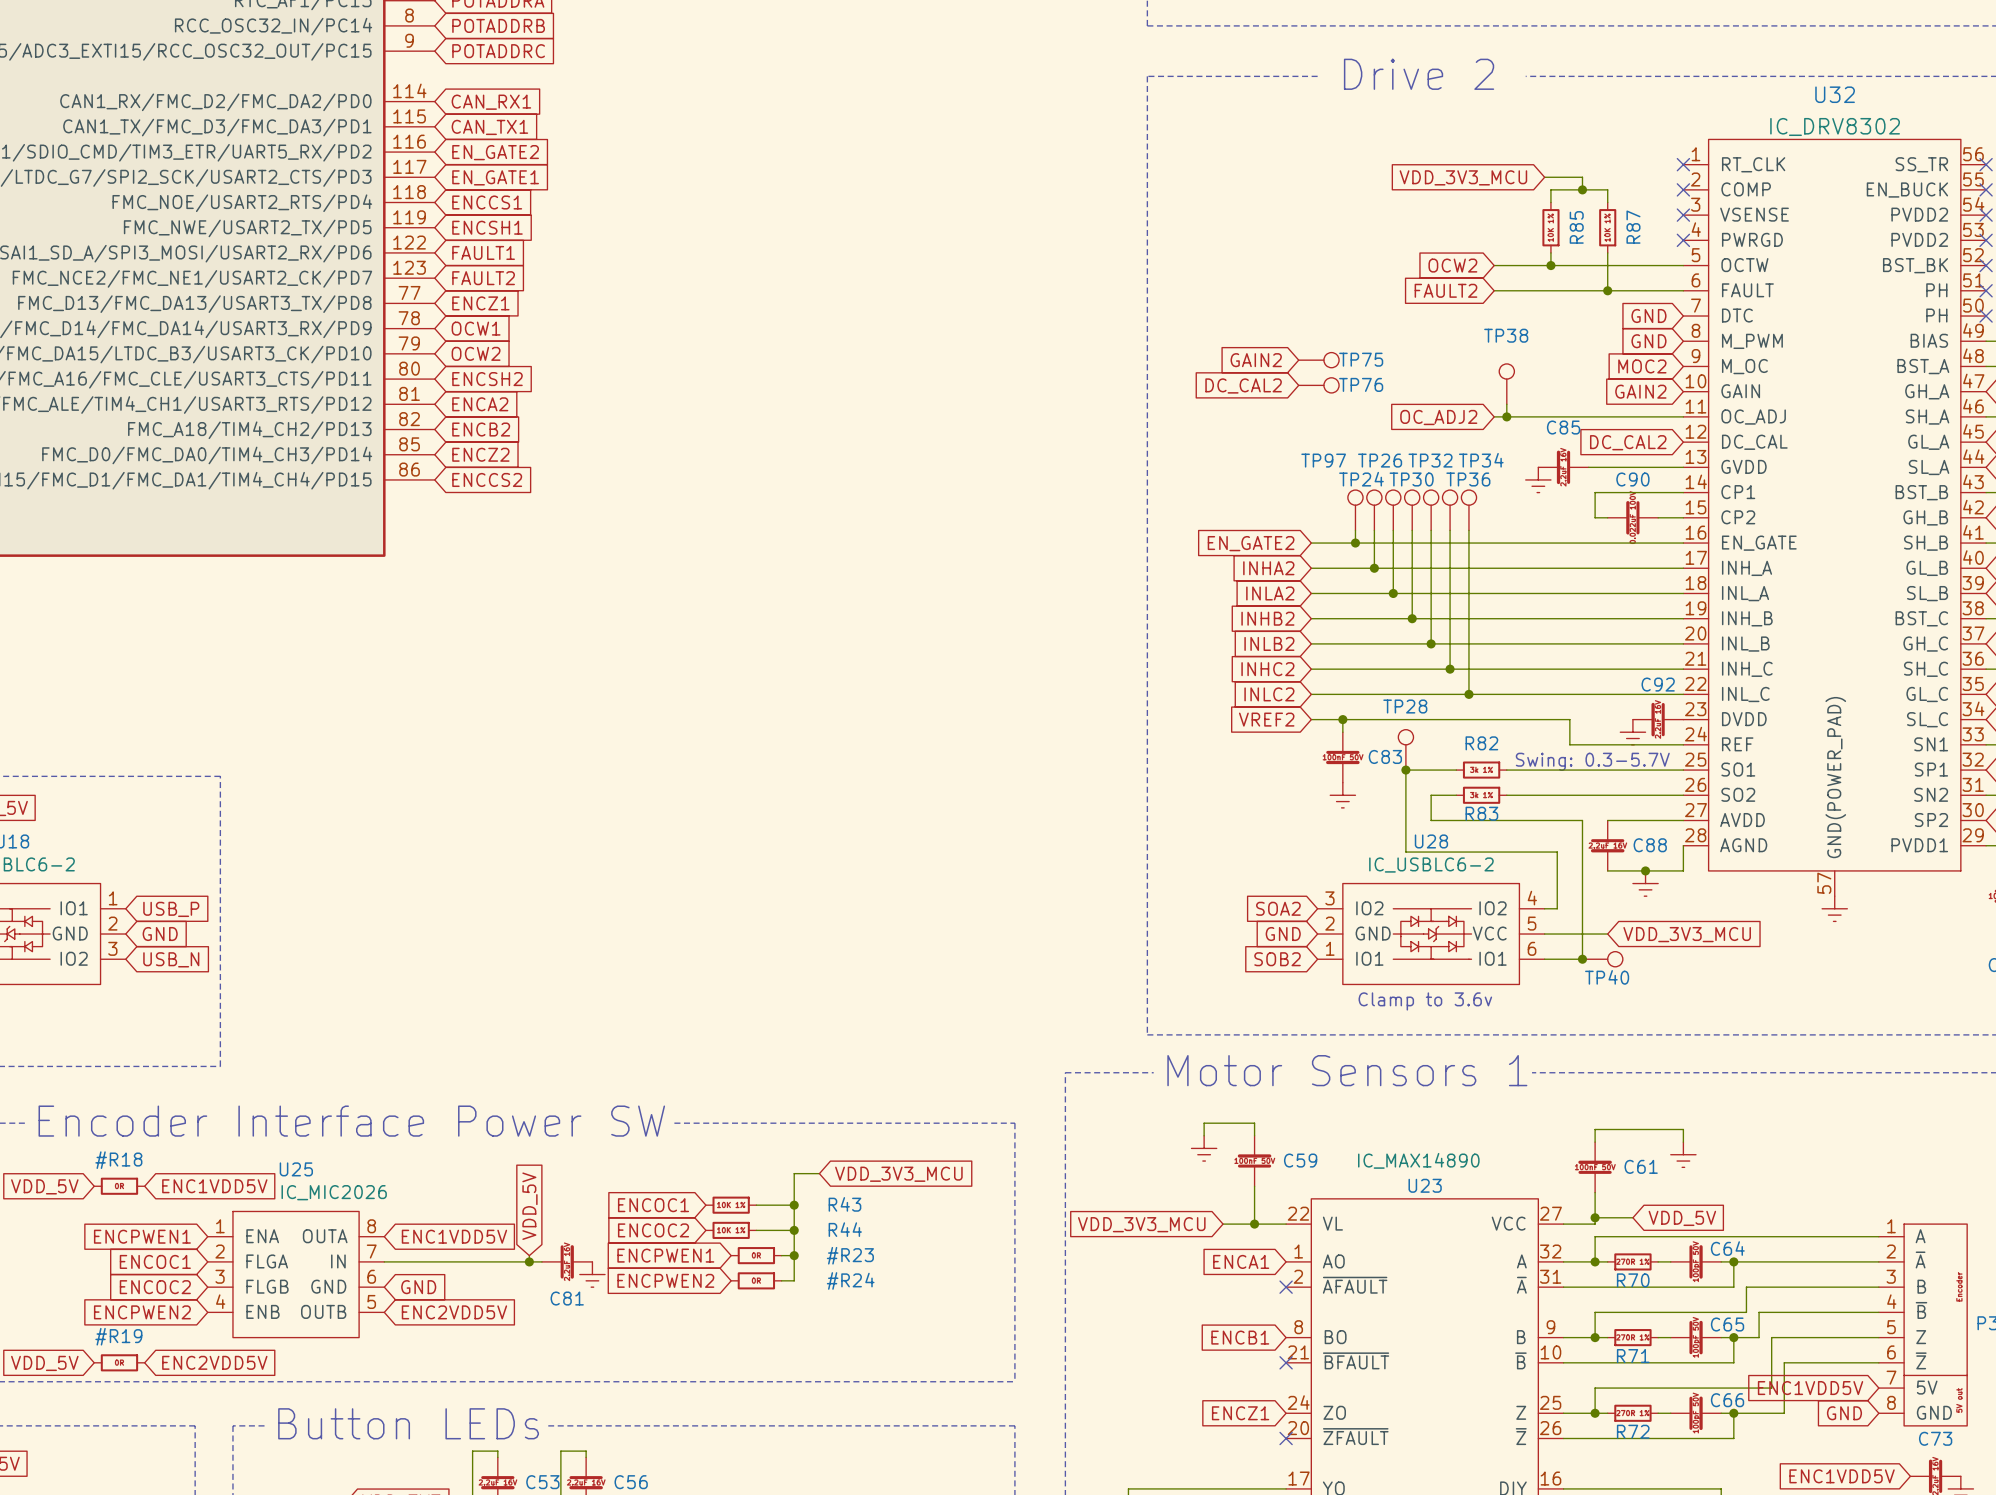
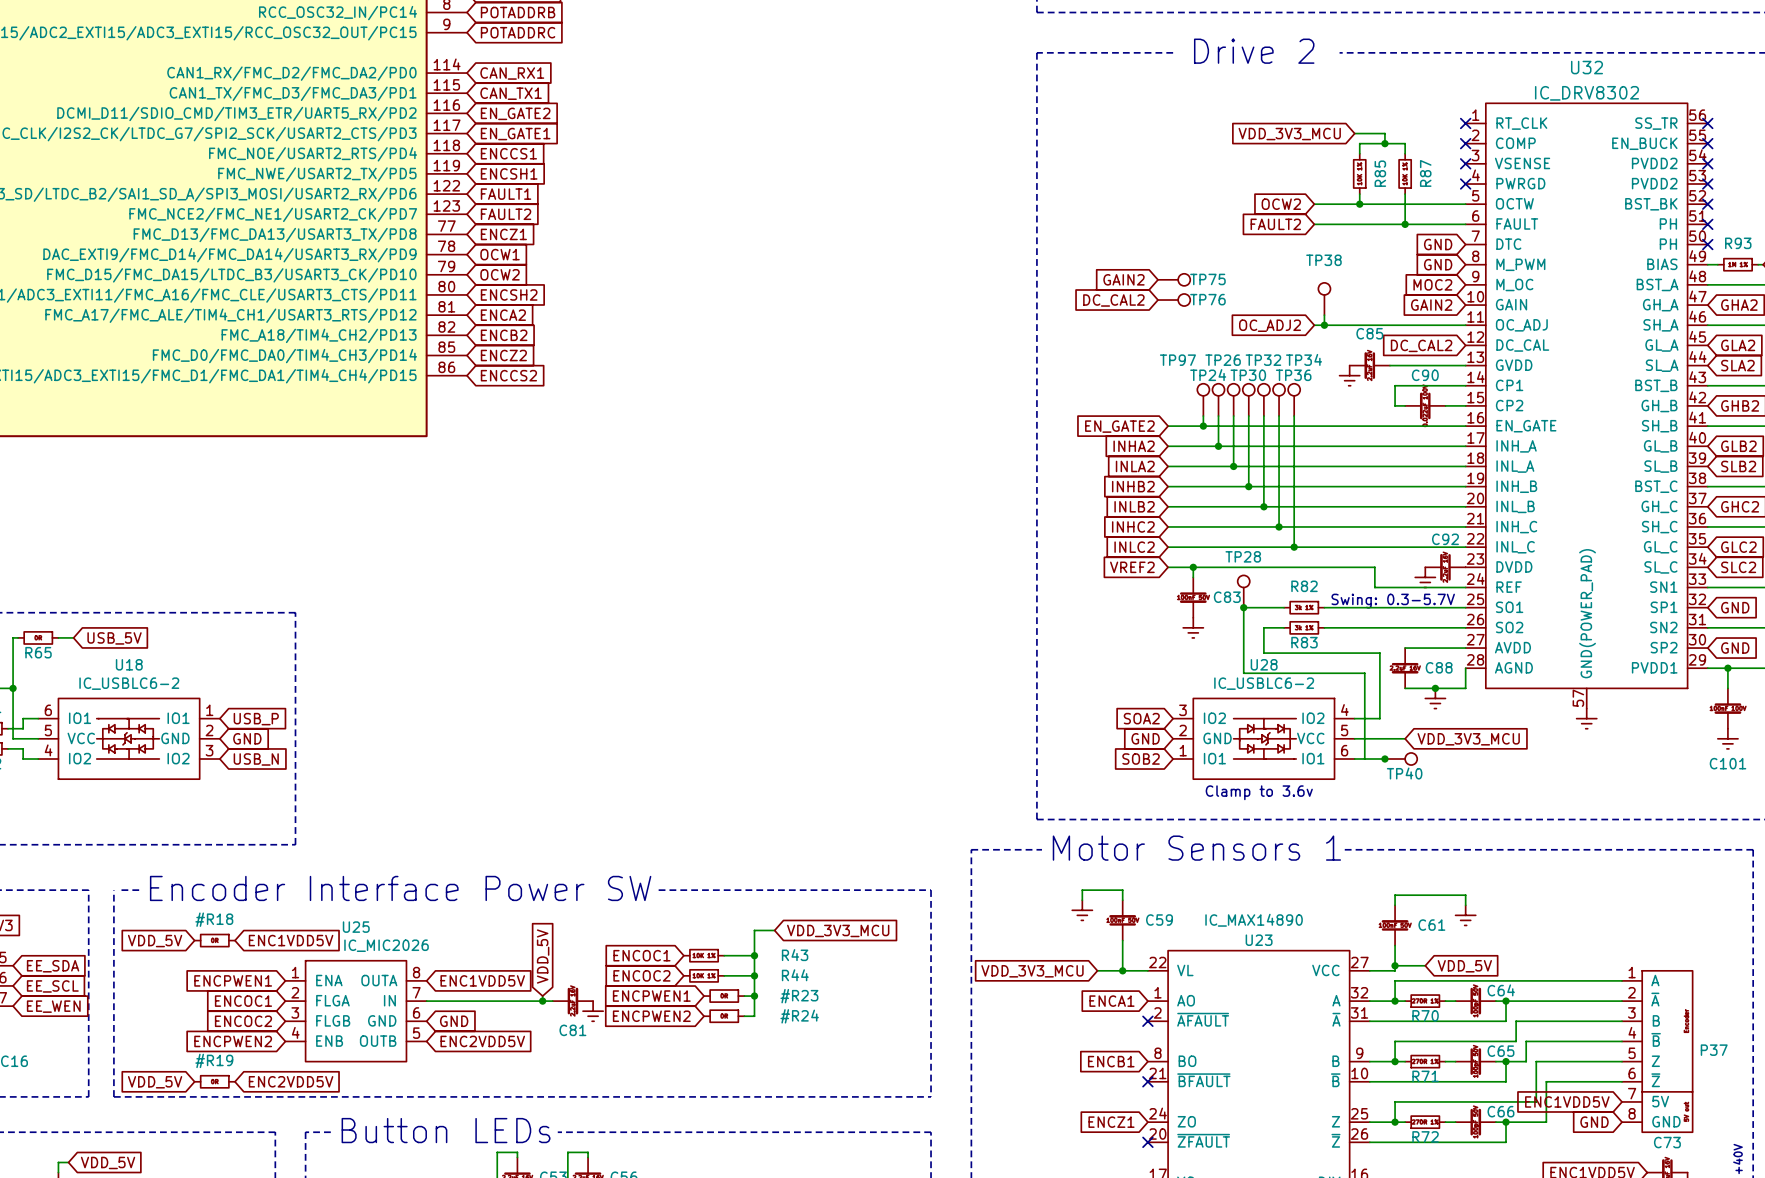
wire: (1431, 820) (1582, 820) (1582, 959) -> (1263, 648) (1263, 653) (1379, 653) (1379, 718) (1364, 718) (1364, 758)

